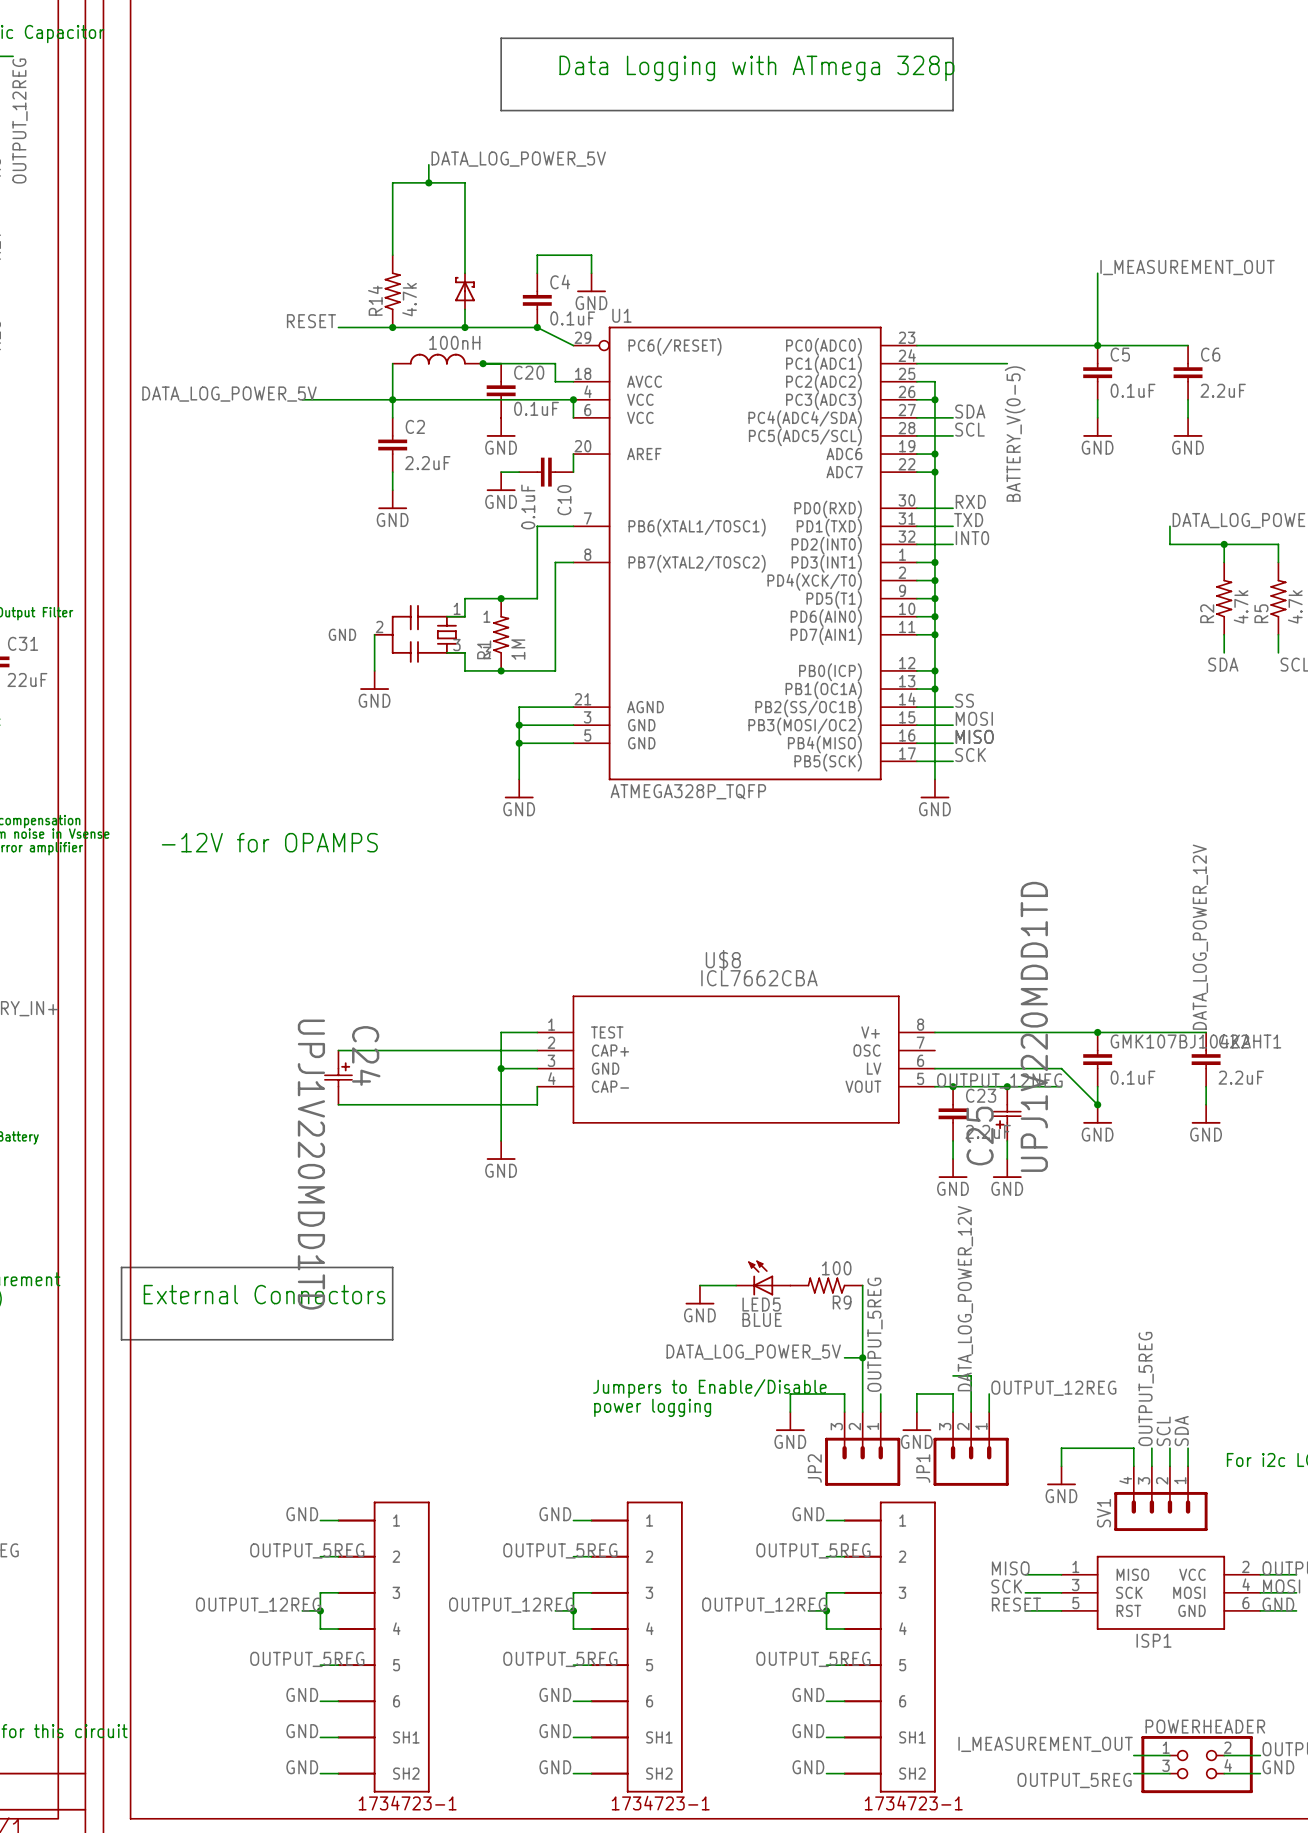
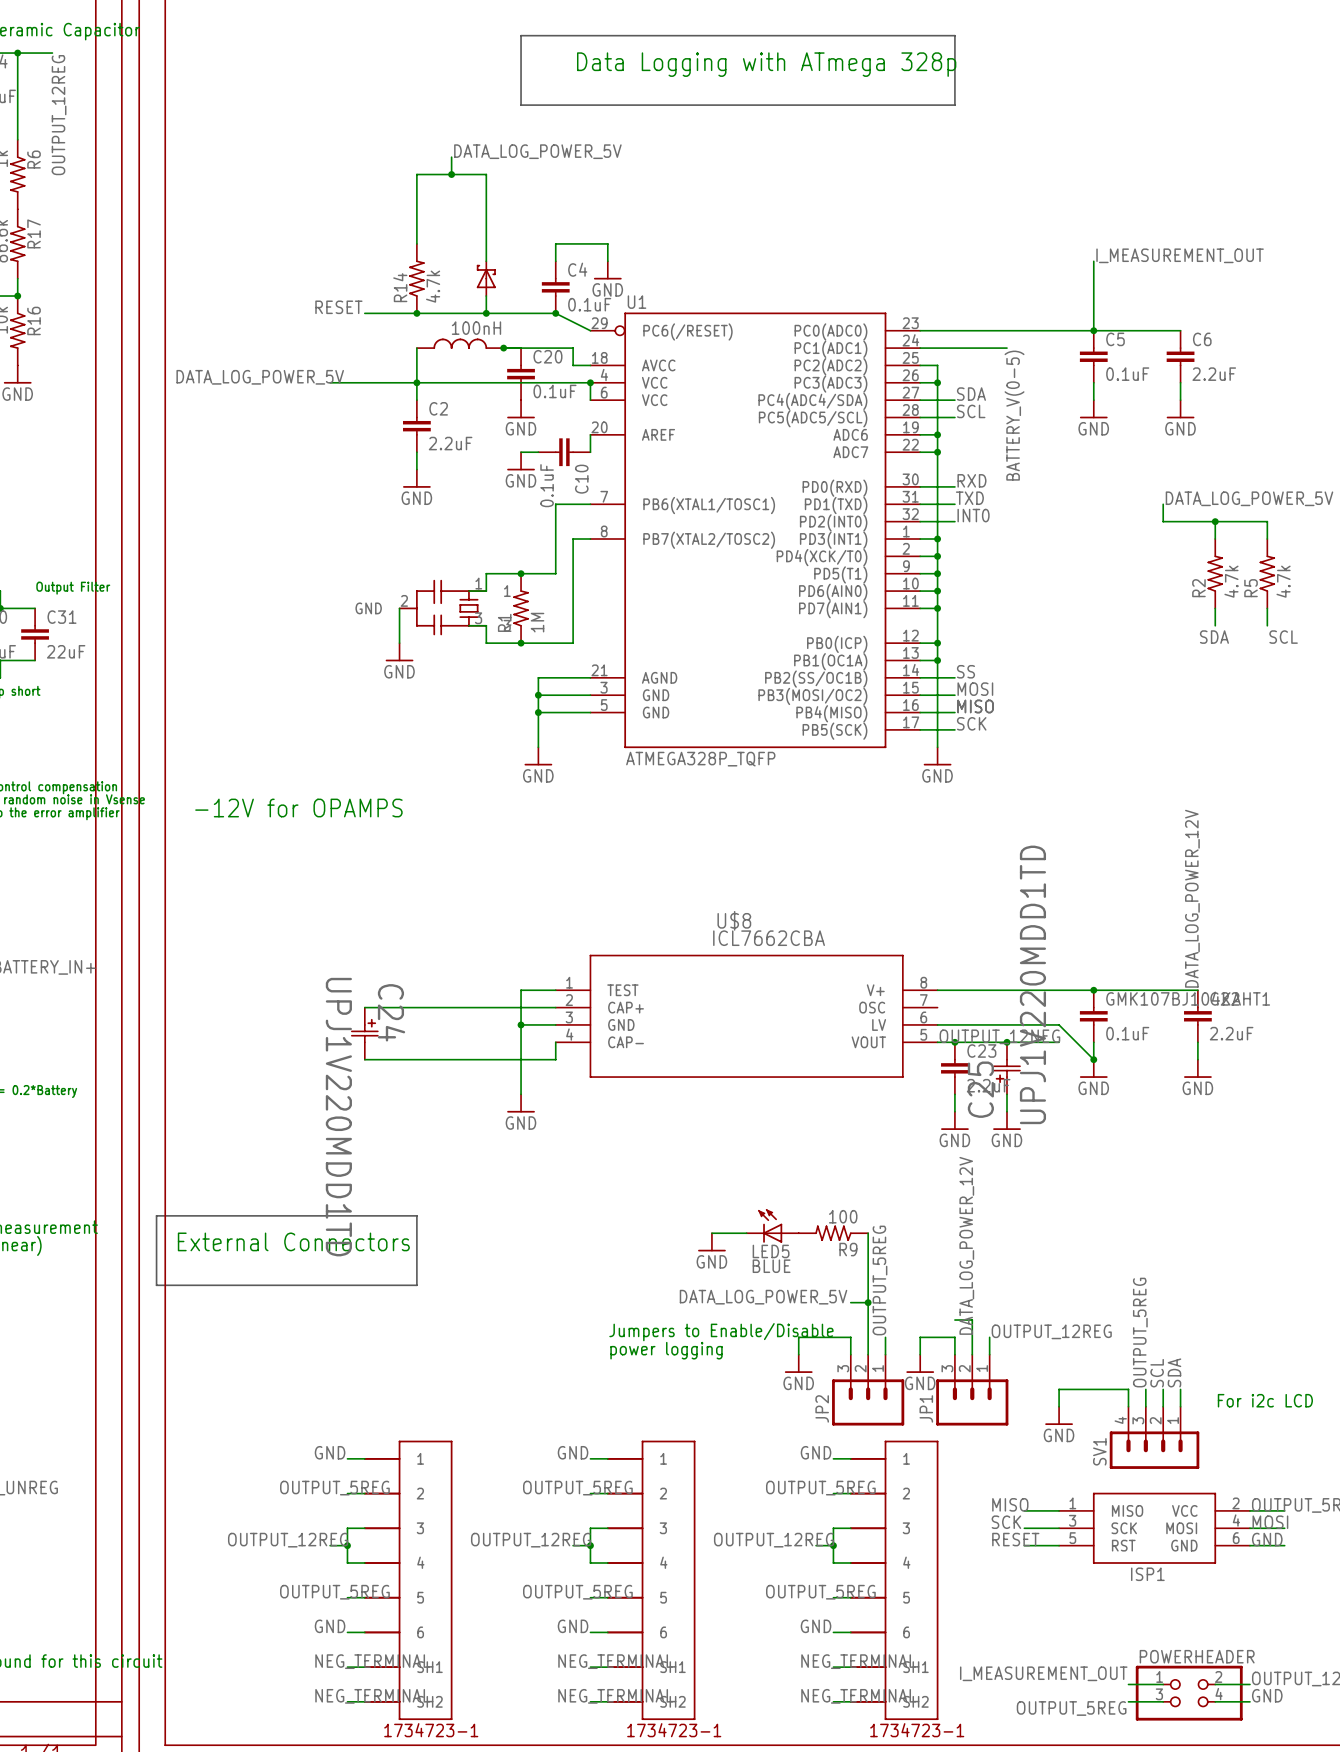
label: GND (302, 1731) -> NEG_TERMINAL (372, 1661)
label: GND (555, 1731) -> NEG_TERMINAL (615, 1661)
label: GND (808, 1731) -> NEG_TERMINAL (858, 1661)
label: GND (302, 1767) -> NEG_TERMINAL (372, 1696)
label: GND (555, 1767) -> NEG_TERMINAL (615, 1696)
label: GND (808, 1767) -> NEG_TERMINAL (858, 1696)

